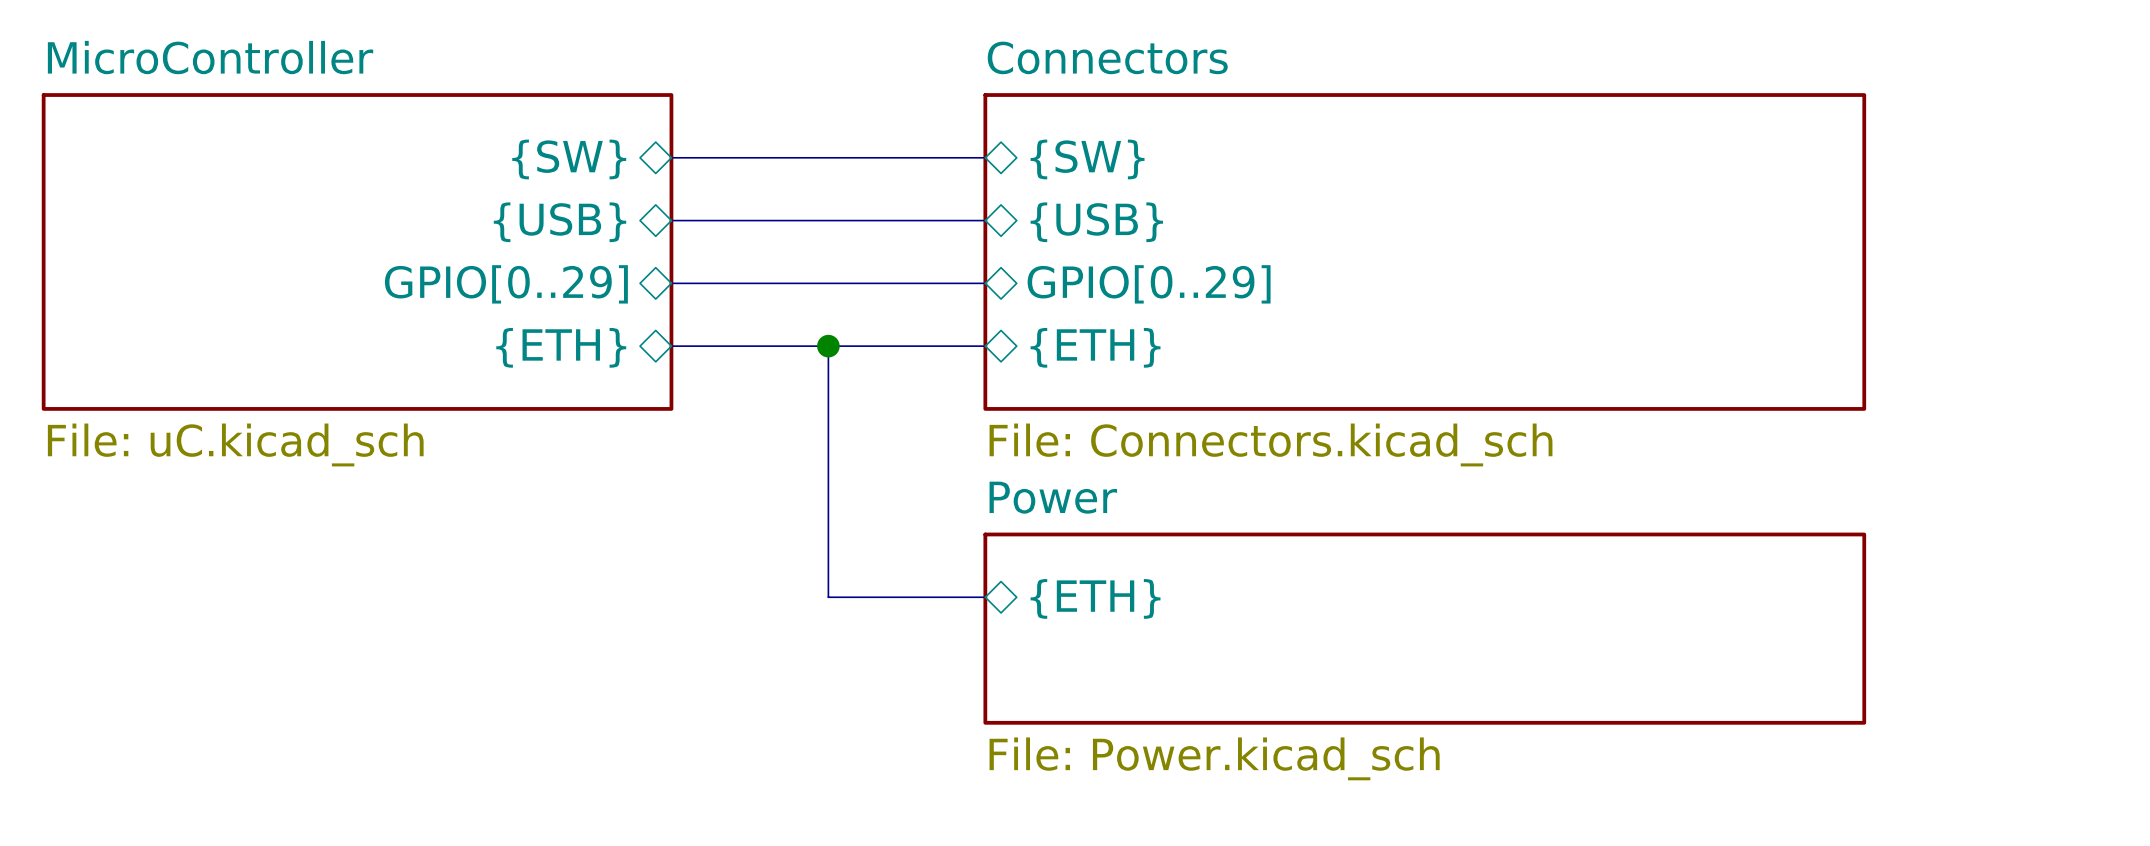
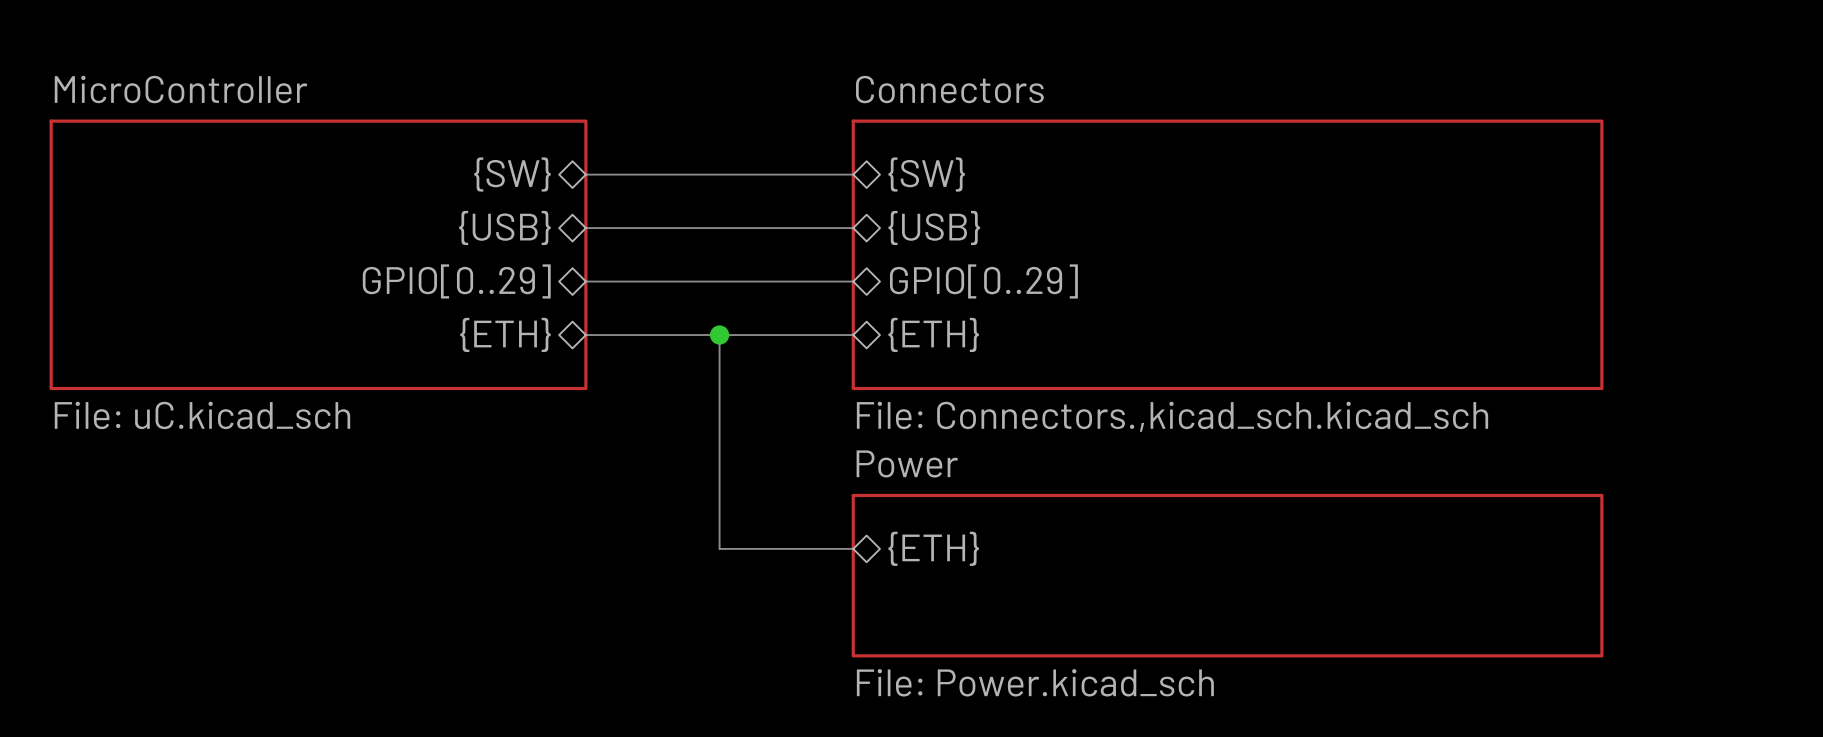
sheet Connectors value: File: Connectors.kicad_sch (1271, 444) -> File: Connectors.,kicad_sch.kicad_sch (1172, 416)

